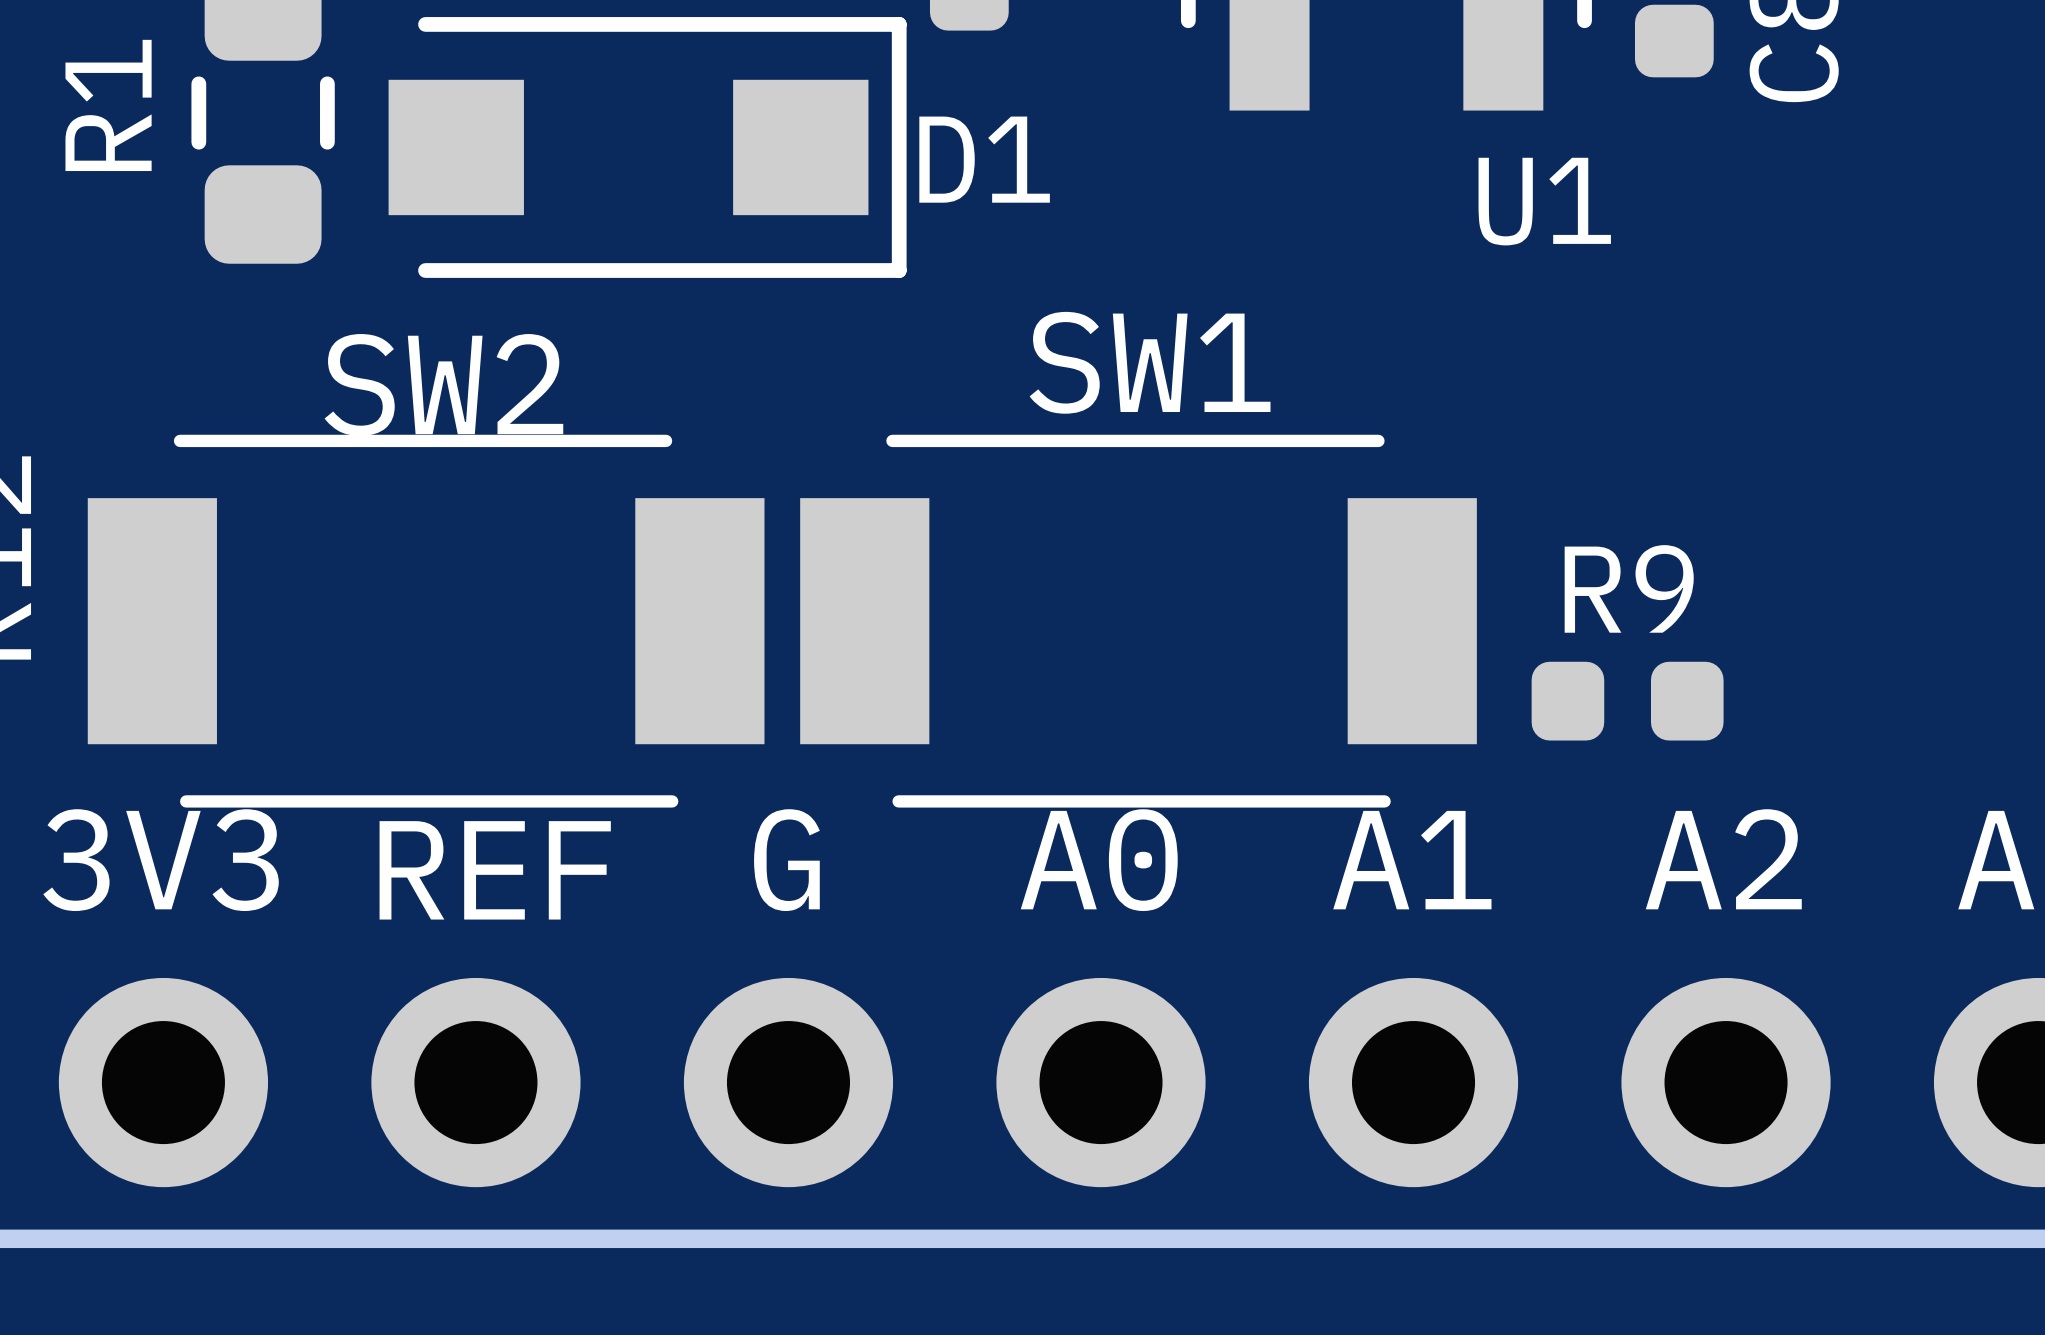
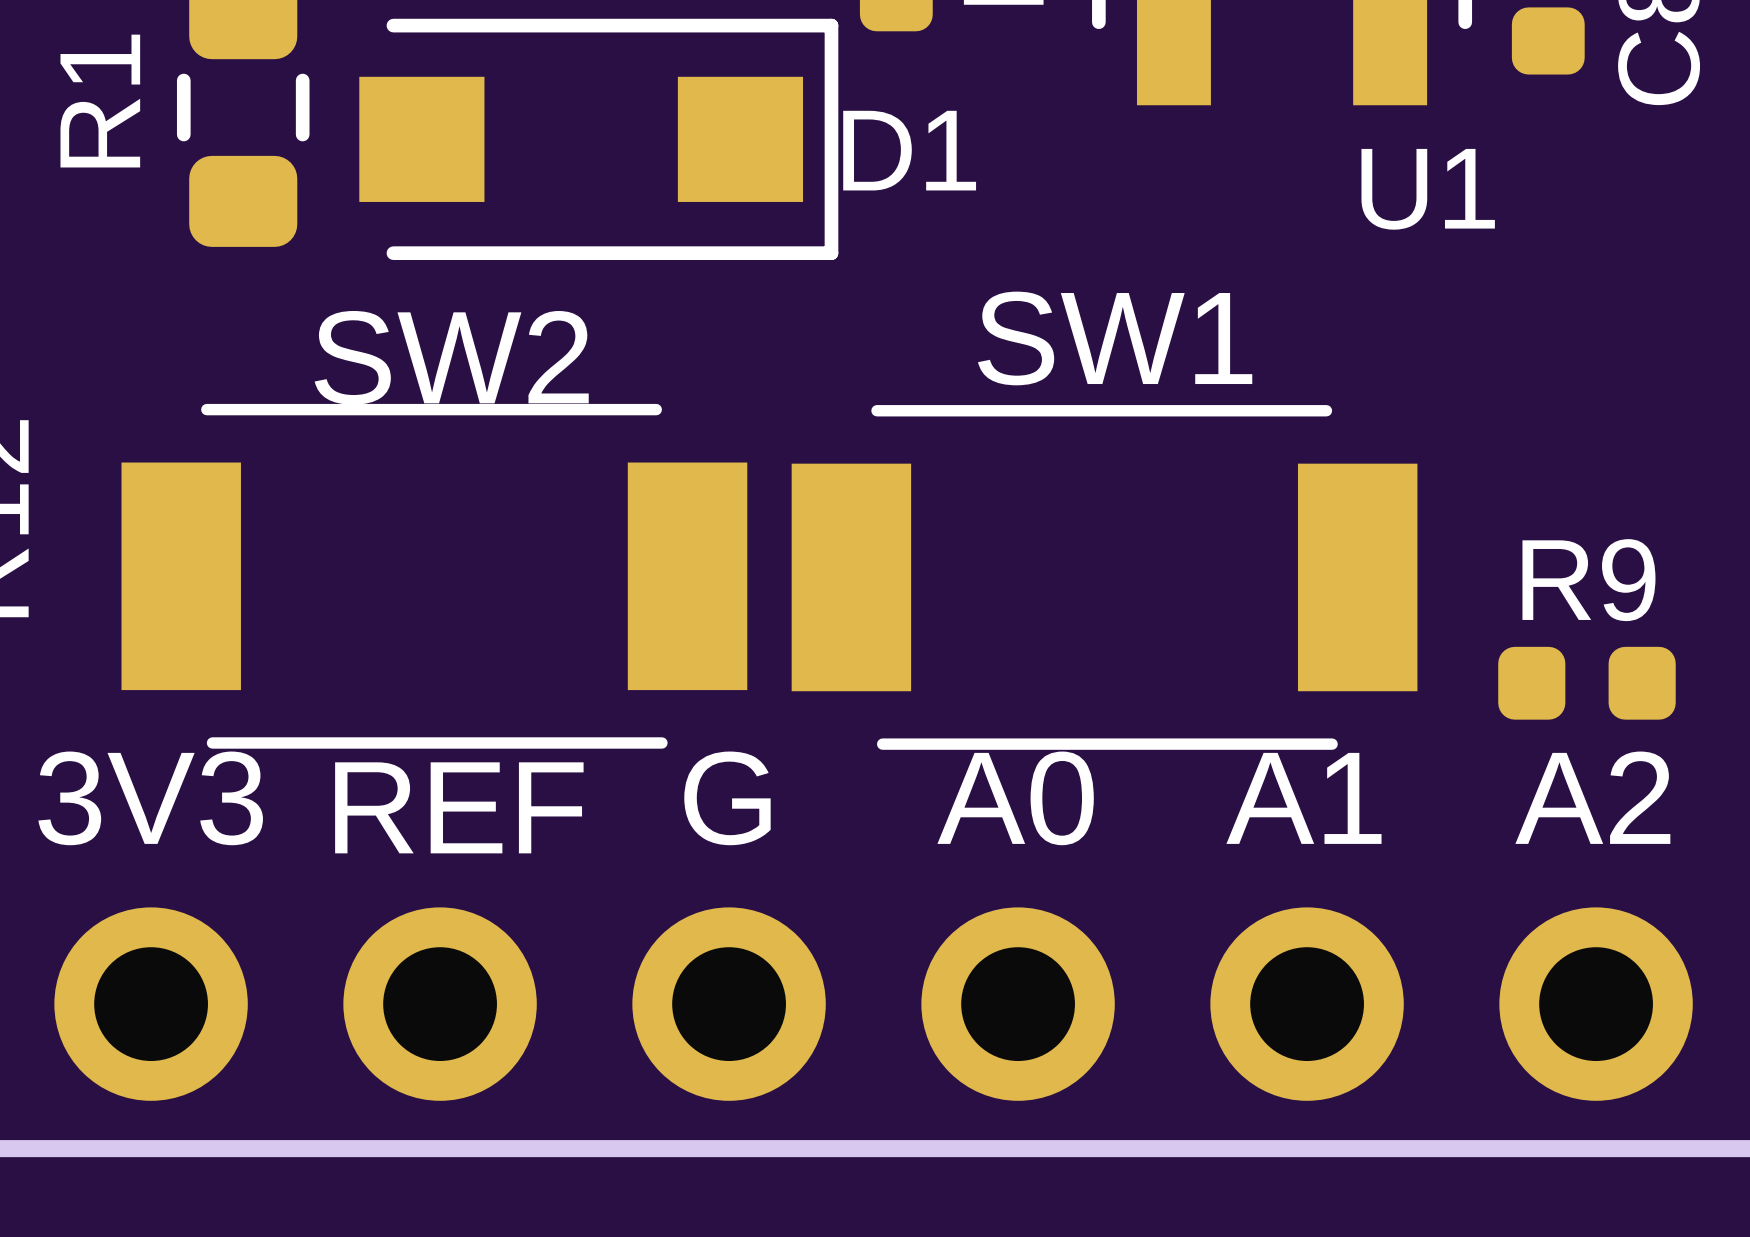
SW2 position: (426, 621) -> (434, 576)
SW1 position: (1138, 621) -> (1104, 577)
R9 position: (1627, 701) -> (1586, 683)

